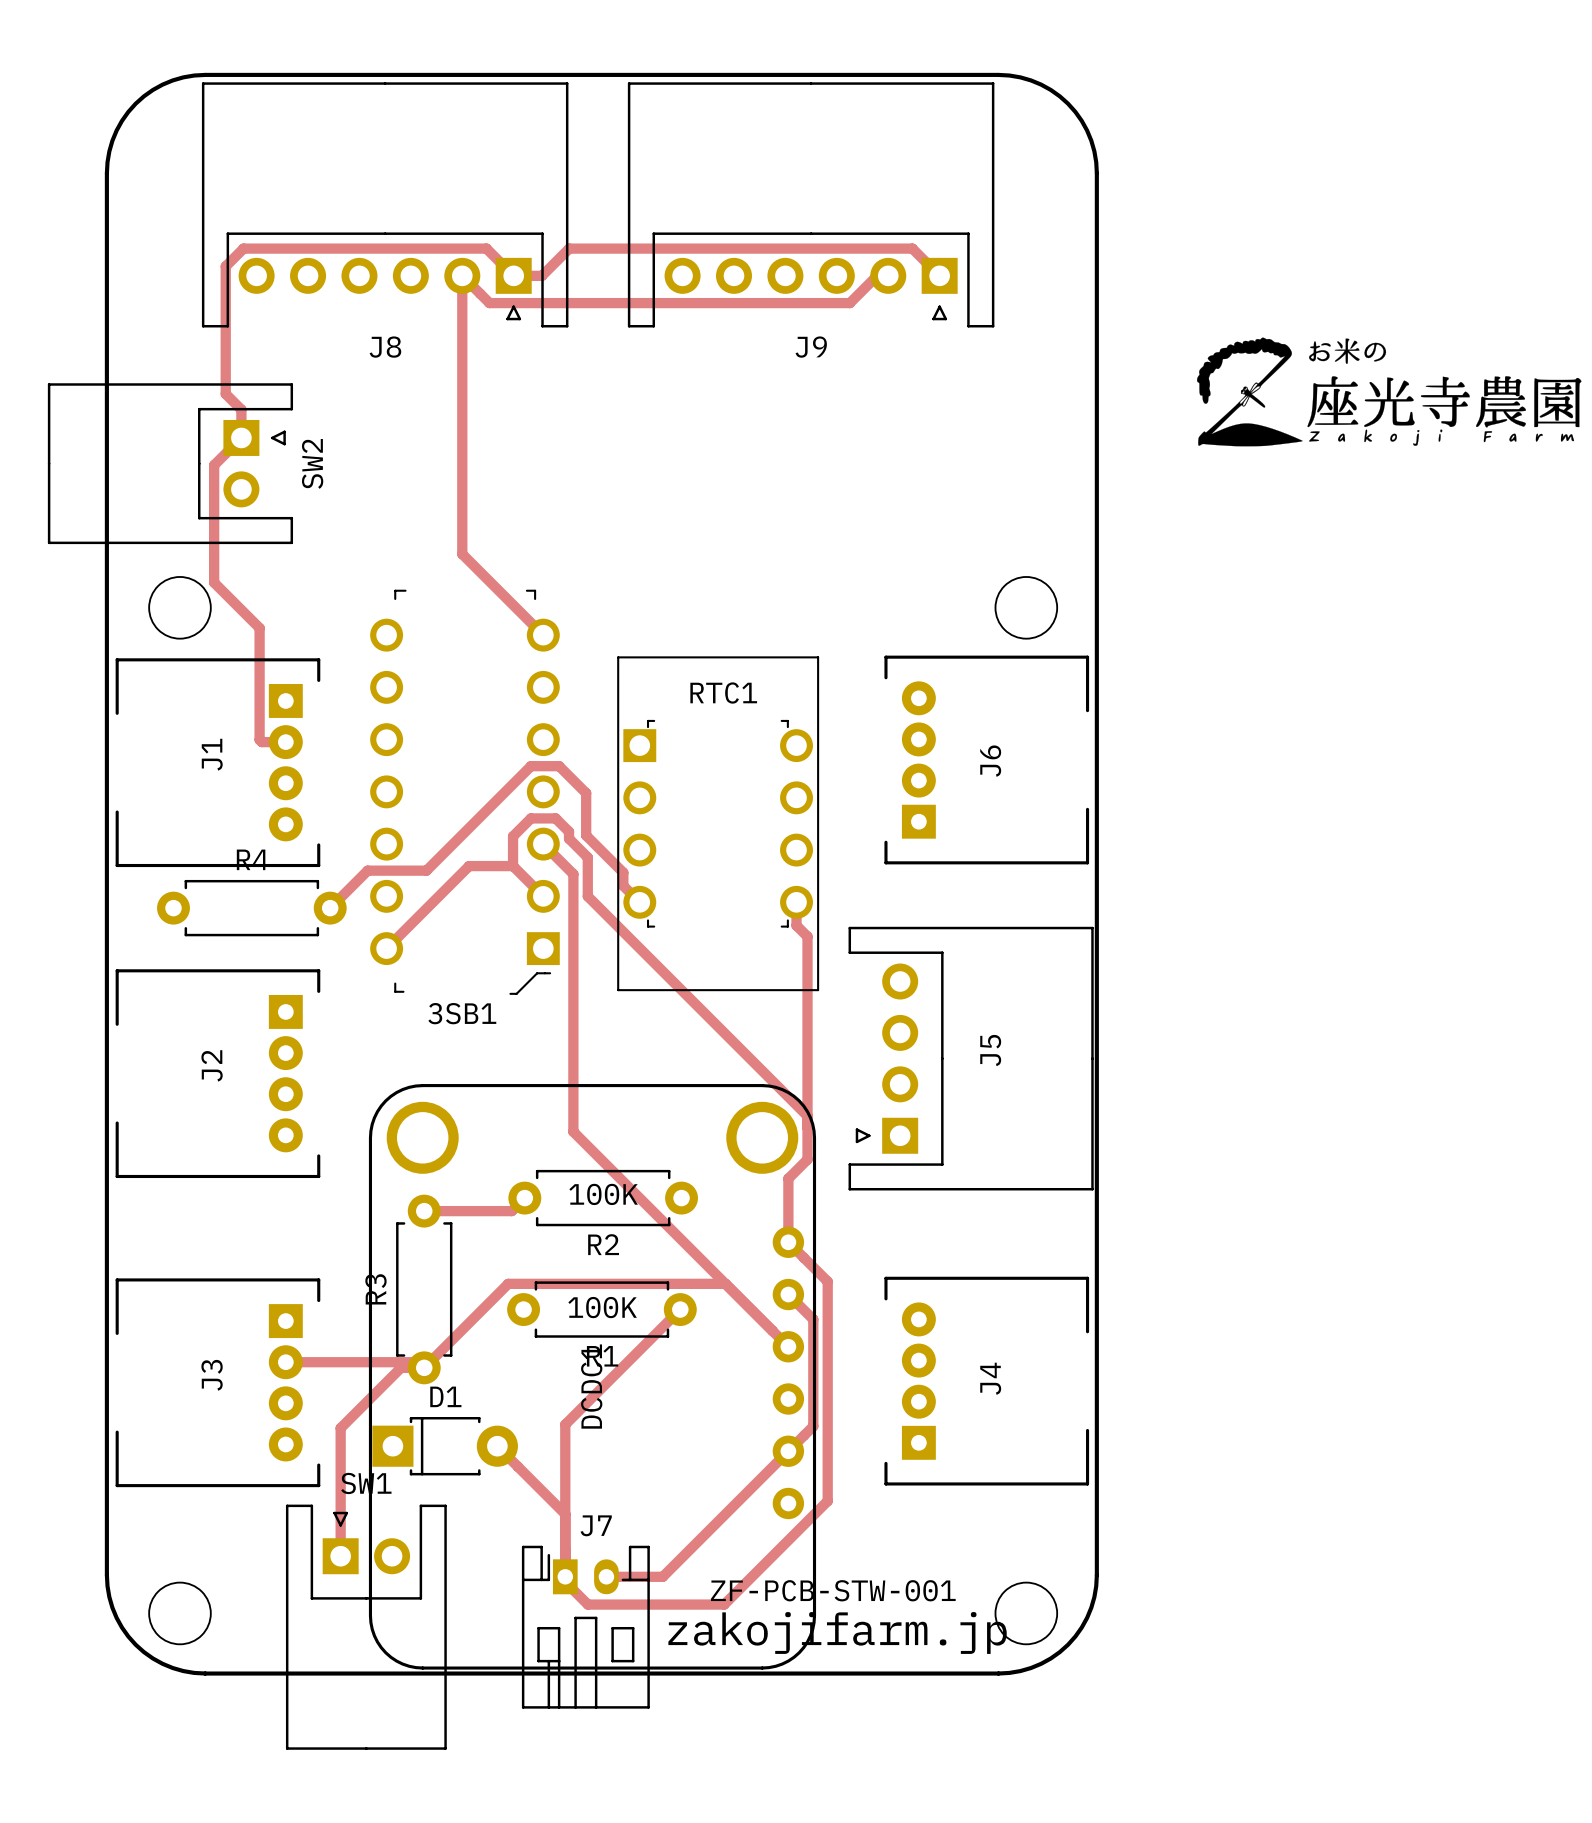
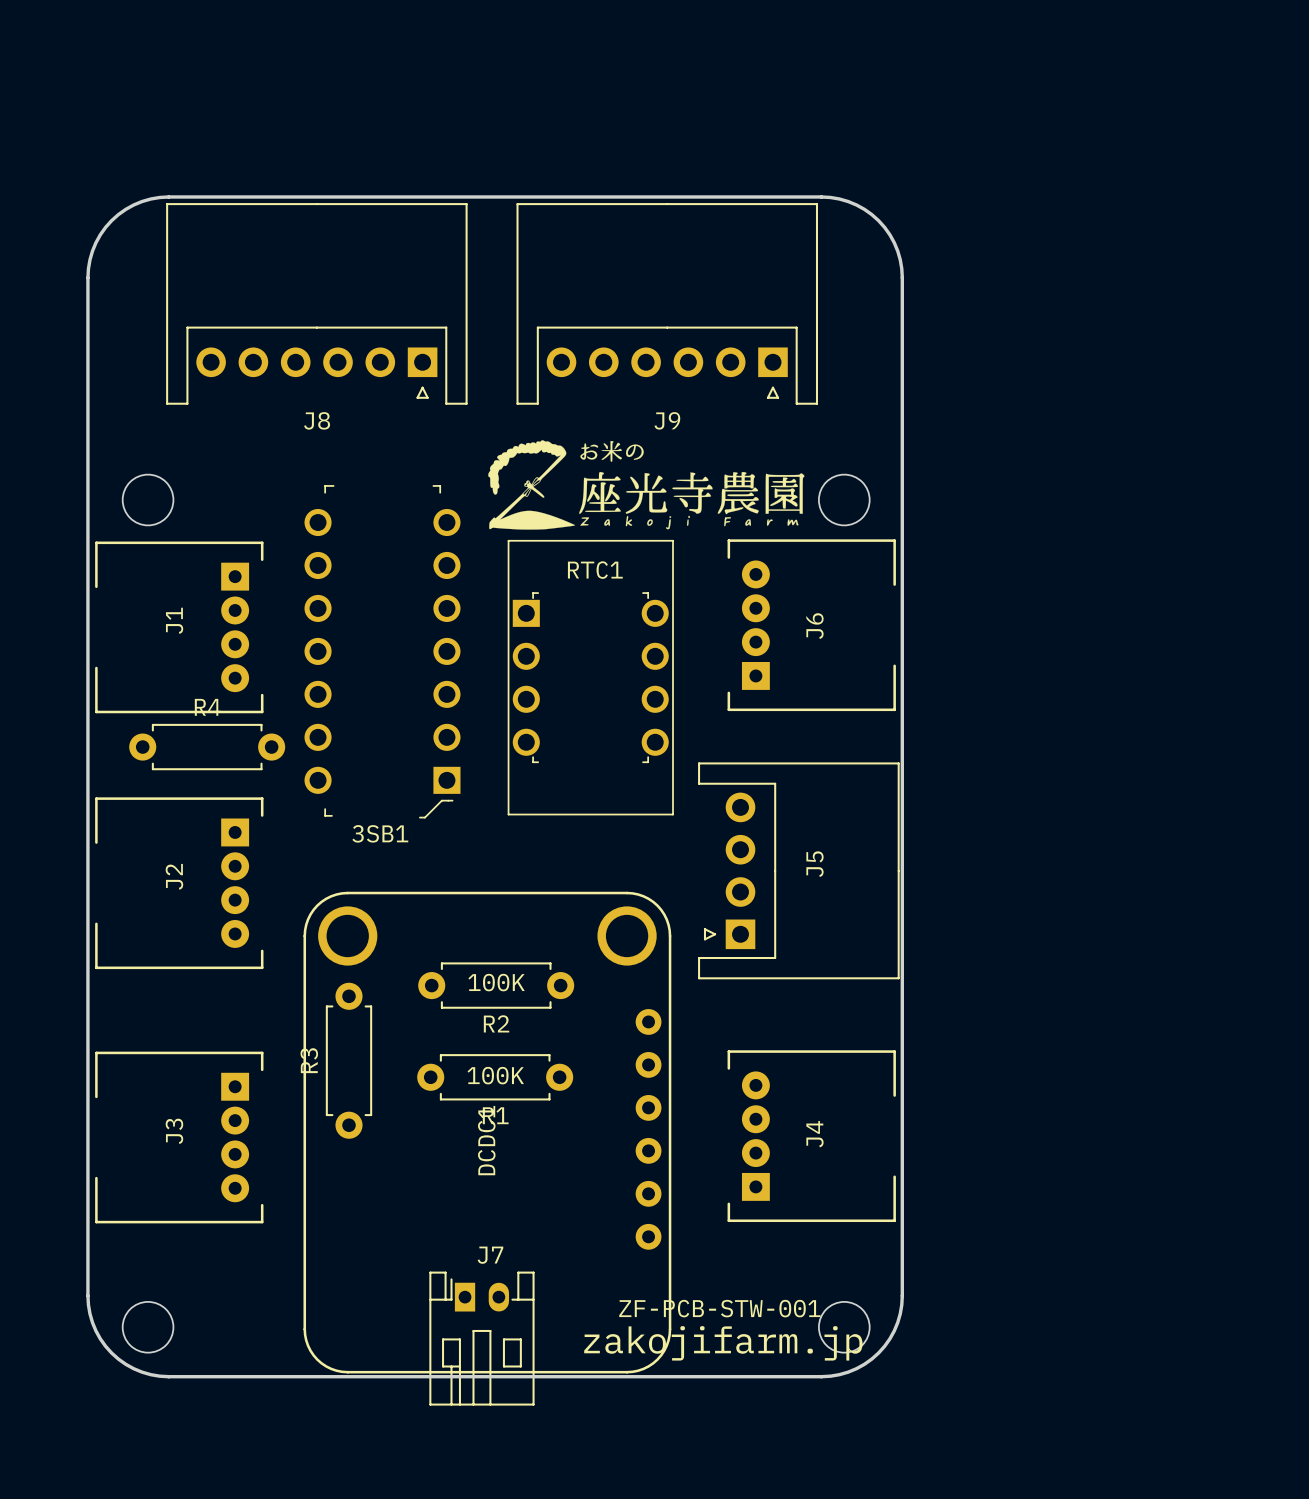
J8 position: (385, 204) -> (316, 303)
J9 position: (811, 204) -> (667, 303)
track: (888, 275) (877, 275) (849, 303) (489, 303) (462, 275) (462, 554) (543, 635) -> none
track: (939, 275) (912, 248) (569, 248) (541, 275) (513, 275) (486, 248) (243, 248) (225, 266) (225, 394) (241, 409) (241, 437) (214, 465) (214, 582) (259, 628) (259, 739) (261, 742) (285, 742) -> none
board edge: (106, 337) (106, 173) (112, 140) (128, 111) (152, 89) (183, 77) (205, 74) (998, 74) (1031, 80) (1059, 96) (1075, 111) (1087, 130) (1094, 151) (1096, 173) (1096, 337) -> (87, 277) (92, 251) (100, 234) (111, 220) (133, 204) (150, 199) (168, 196) (830, 197) (856, 204) (871, 214) (884, 227) (897, 251) (902, 277)
drawing: [1196, 337, 1582, 447] -> none
SW2: (170, 463) -> none
drawing: none -> [488, 440, 805, 530]
track: (543, 844) (573, 874) (573, 1131) (788, 1346) -> none
track: (513, 866) (543, 896) -> none
track: (513, 866) (513, 836) (530, 818) (555, 818) (569, 831) (569, 838) (587, 857) (587, 896) (807, 1116) -> none
track: (513, 866) (469, 866) (386, 948) -> none
track: (639, 902) (623, 885) (623, 872) (586, 835) (586, 793) (559, 766) (530, 766) (426, 870) (367, 870) (330, 908) -> none
track: (796, 902) (796, 925) (807, 936) (807, 1159) (788, 1178) (788, 1242) (827, 1281) (827, 1501) (724, 1604) (587, 1604) (565, 1581) (565, 1424) (680, 1309) -> none
track: (524, 1198) (511, 1211) (424, 1211) -> none
track: (725, 1283) (508, 1283) (424, 1367) -> none
track: (788, 1294) (813, 1319) (813, 1426) (662, 1576) (606, 1576) -> none
track: (285, 1362) (418, 1362) (424, 1367) -> none
track: (424, 1367) (400, 1367) (340, 1428) (340, 1556) -> none
D1: (445, 1446) -> none
track: (497, 1446) (565, 1514) -> none
text position: ZF-PCB-STW-001 (833, 1590) -> ZF-PCB-STW-001 (719, 1308)
SW1: (366, 1627) -> none
text position: zakojifarm.jp (837, 1632) -> zakojifarm.jp (723, 1343)

